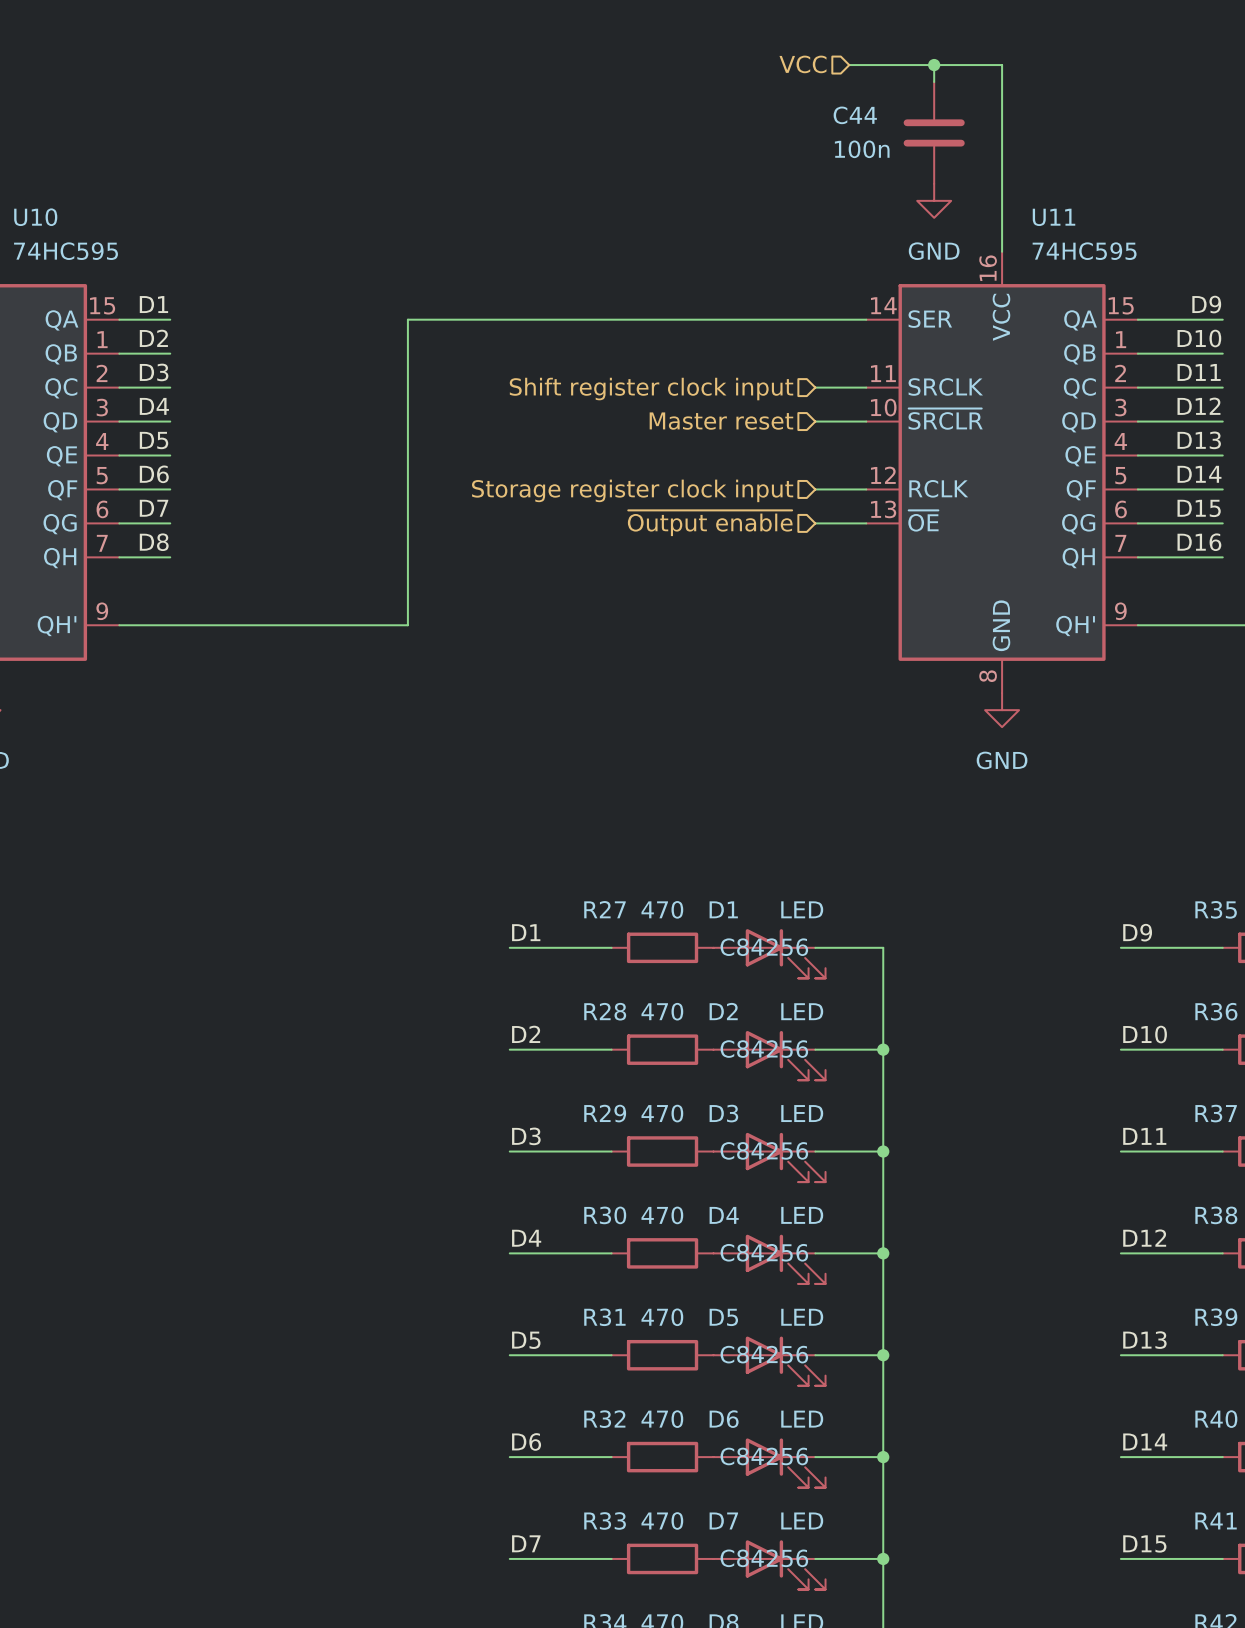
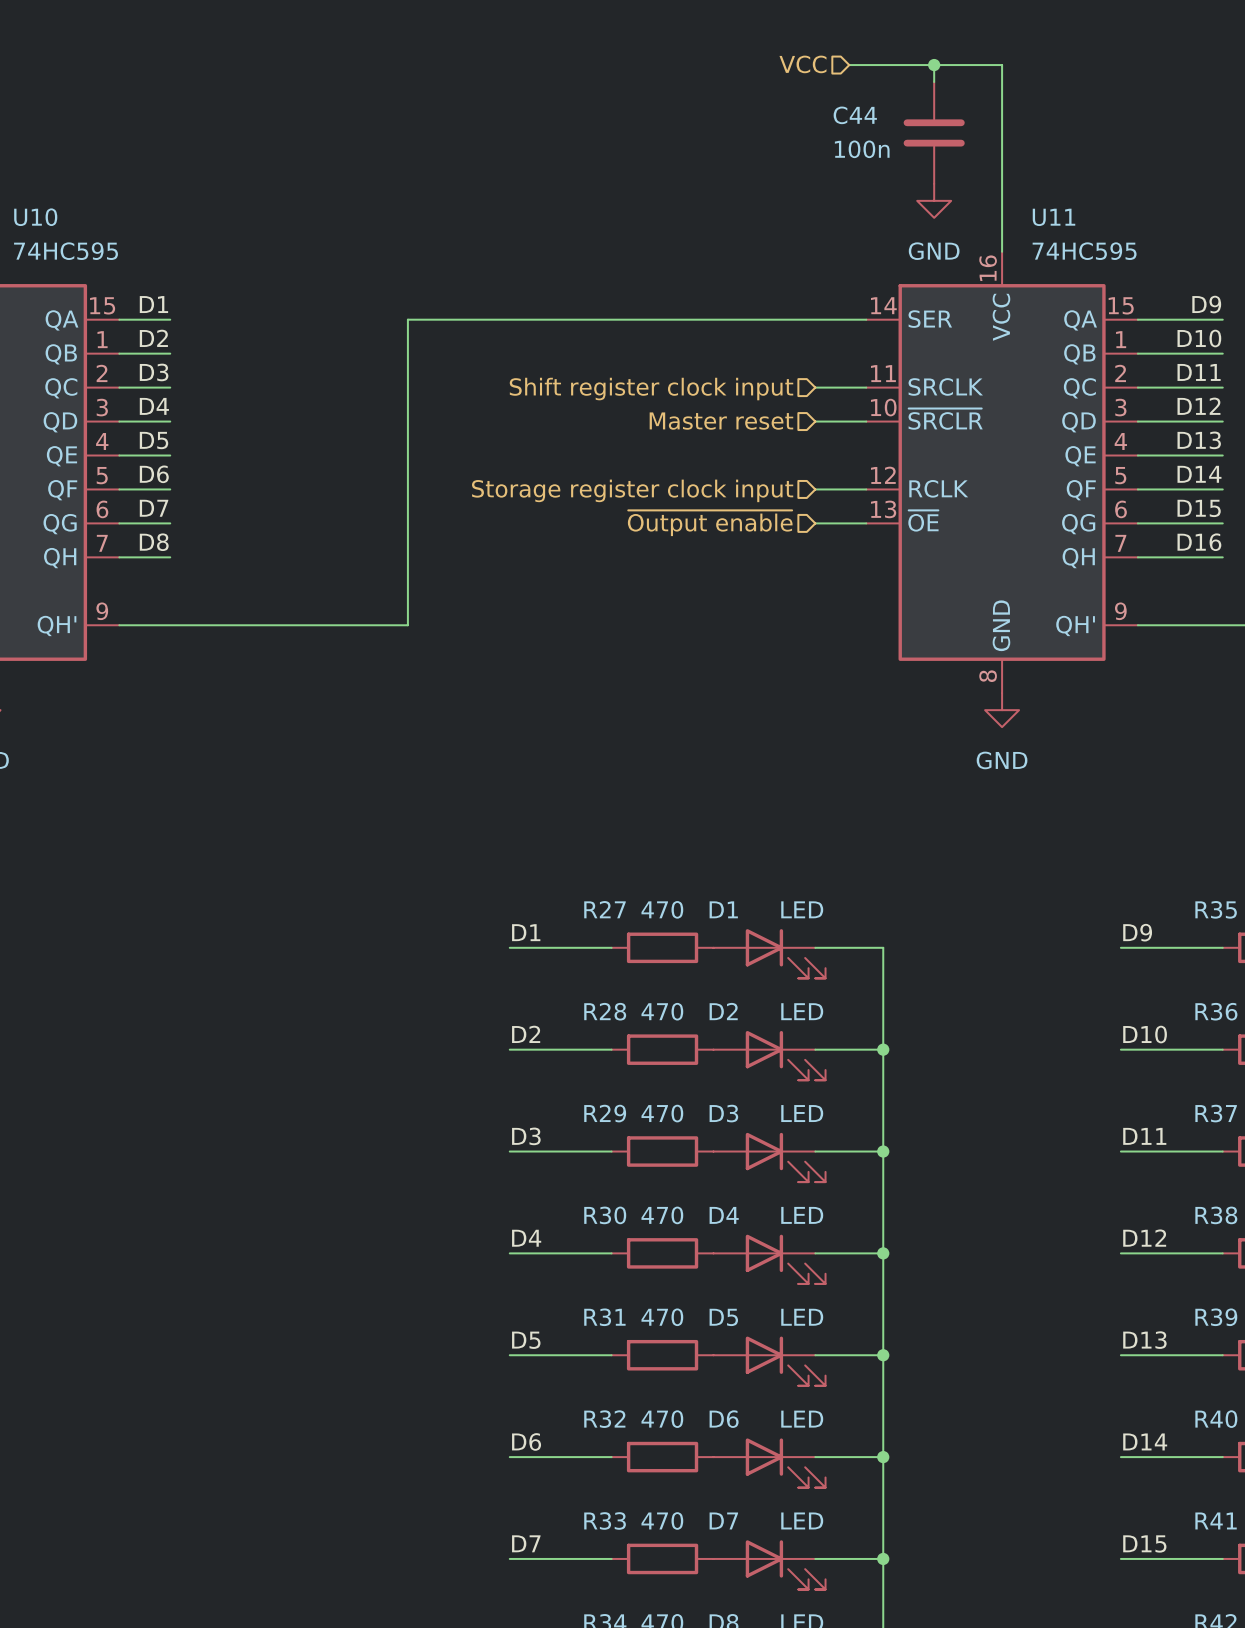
D1 text: C84256 (764, 947) -> none
D2 text: C84256 (764, 1049) -> none
D3 text: C84256 (764, 1150) -> none
D4 text: C84256 (764, 1252) -> none
D5 text: C84256 (764, 1354) -> none
D6 text: C84256 (764, 1456) -> none
D7 text: C84256 (764, 1558) -> none

